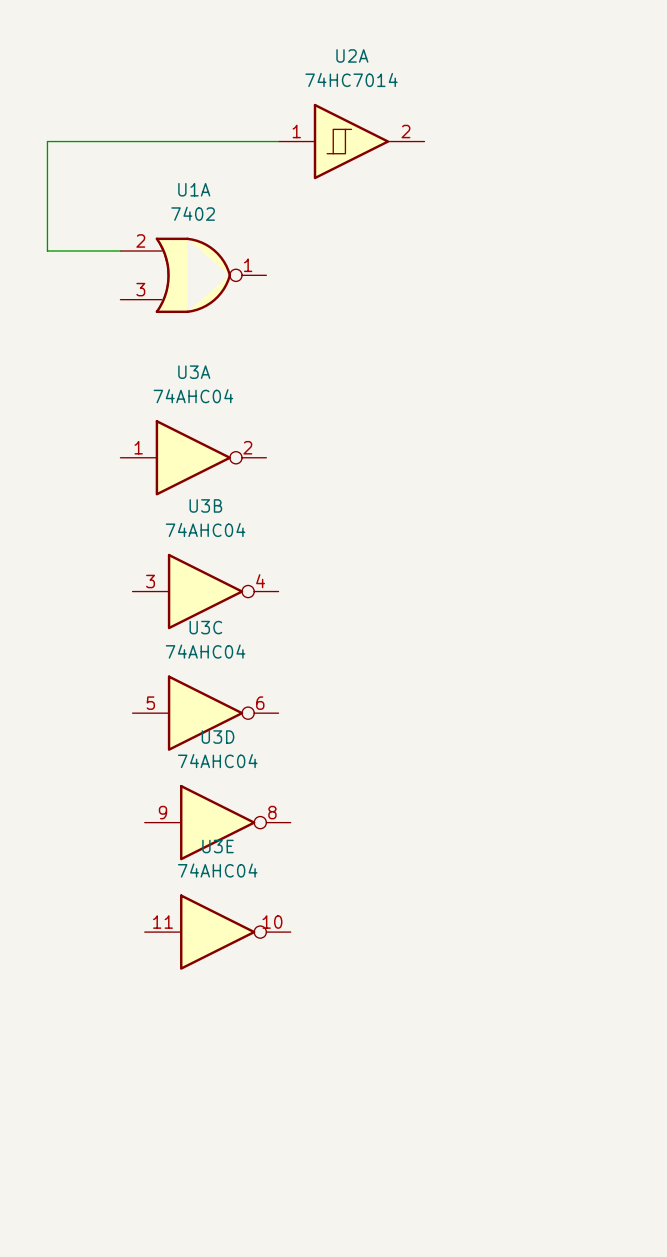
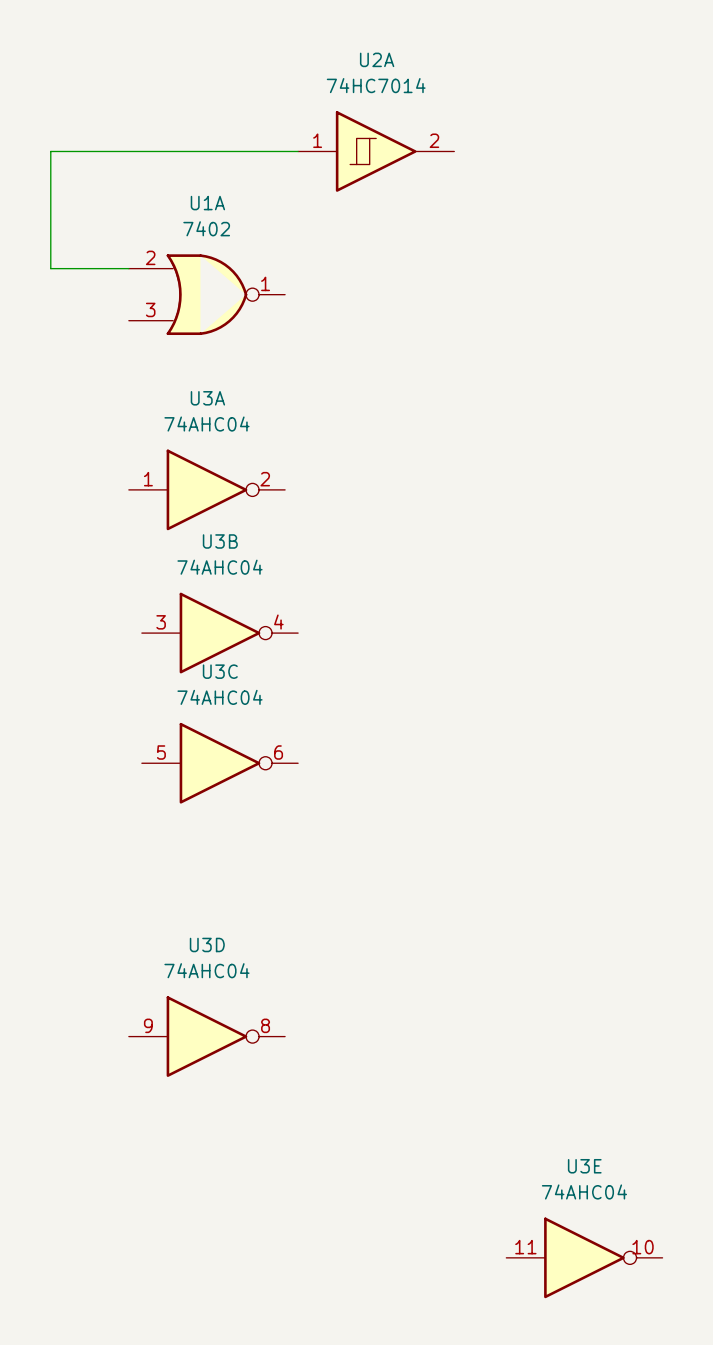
U3D position: (217, 822) -> (206, 1036)
U3E position: (217, 932) -> (584, 1257)

